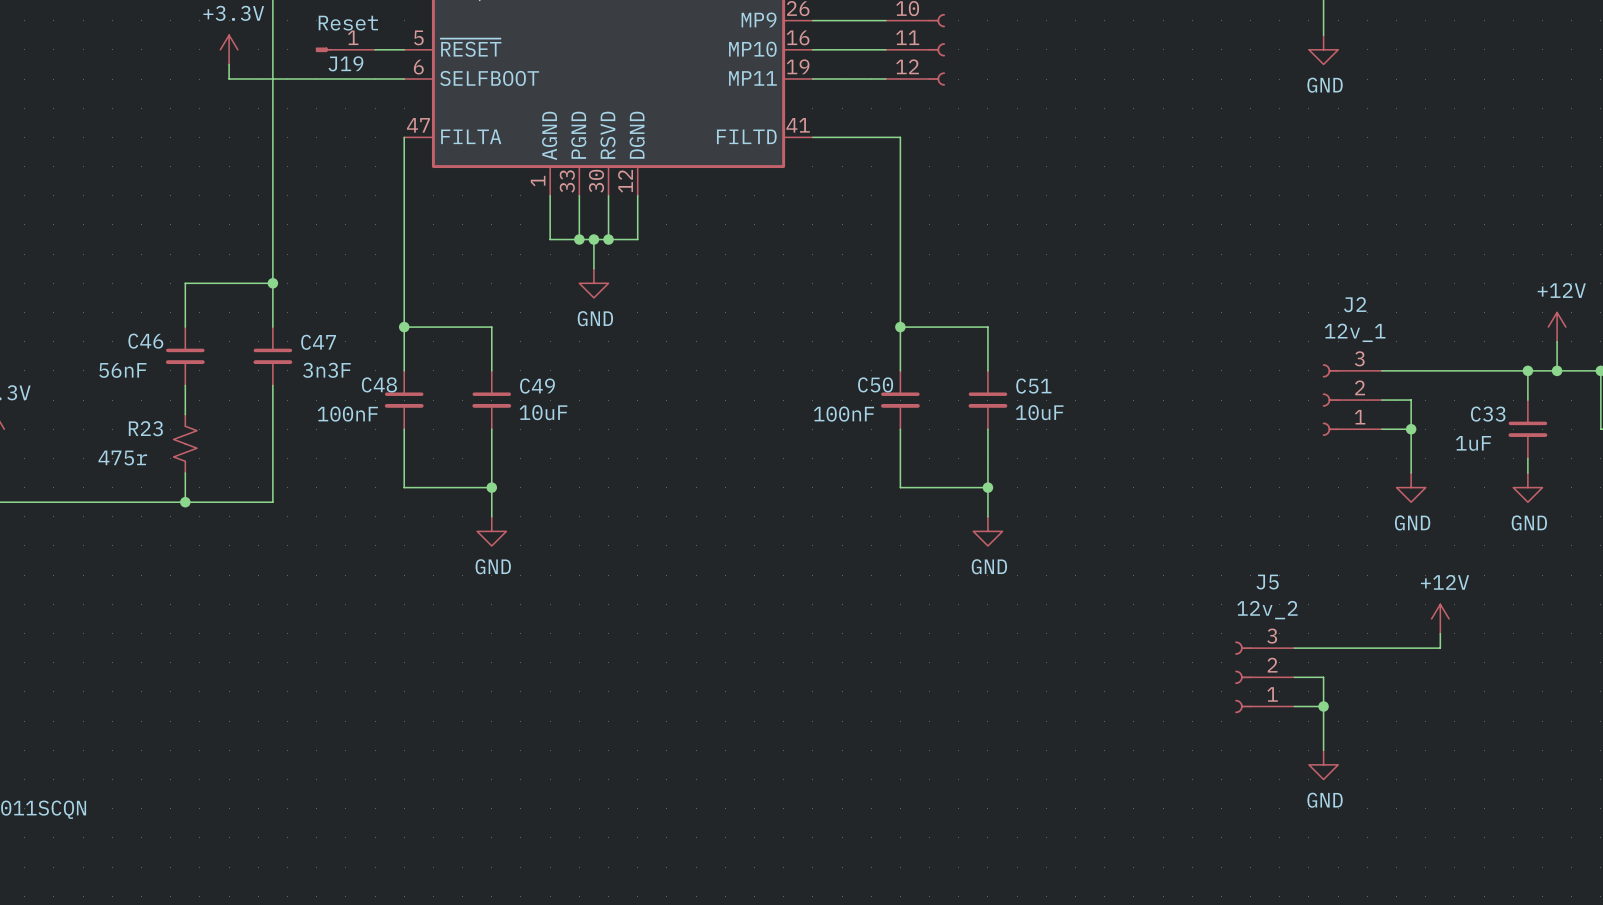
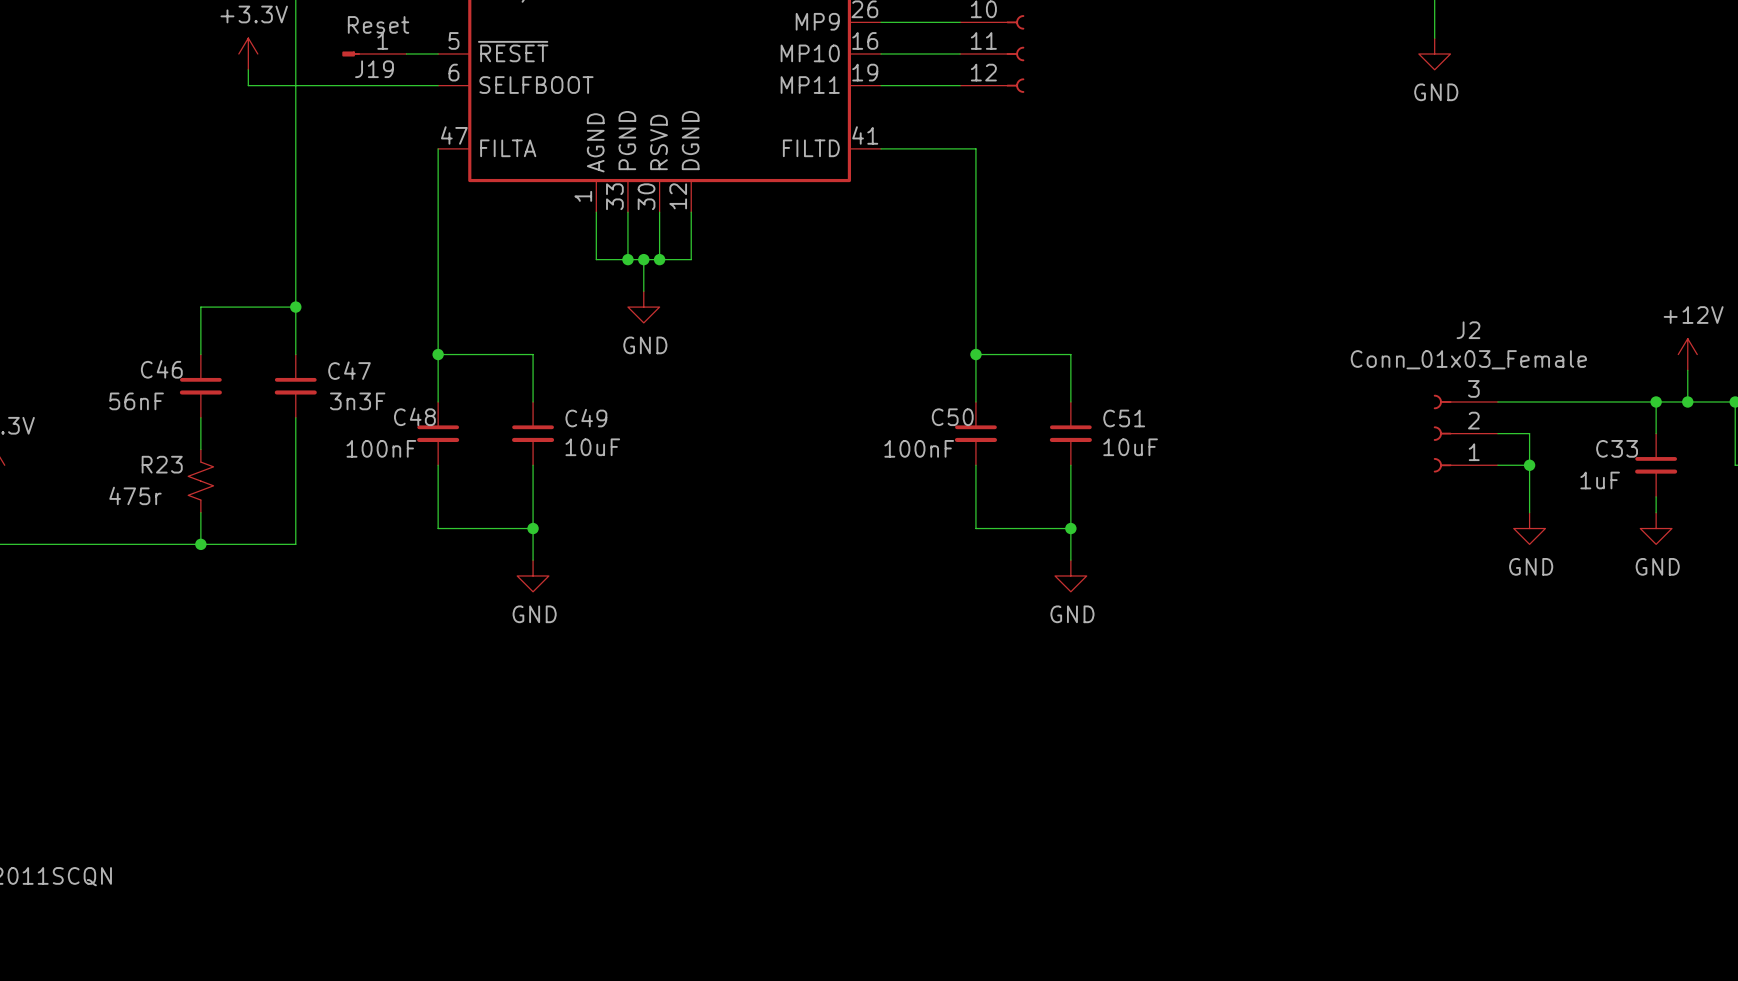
J2 value: 12v_1 (1355, 332) -> Conn_01x03_Female (1468, 359)
power symbol: +12V (1440, 618) -> none
wire: (1440, 633) (1440, 648) (1294, 648) -> none
J5: 12v_2 (1264, 677) -> none
wire: (1294, 677) (1323, 677) (1323, 750) -> none
wire: (1294, 706) (1323, 706) -> none
junction: (1323, 706) -> none
power symbol: GND (1323, 764) -> none

